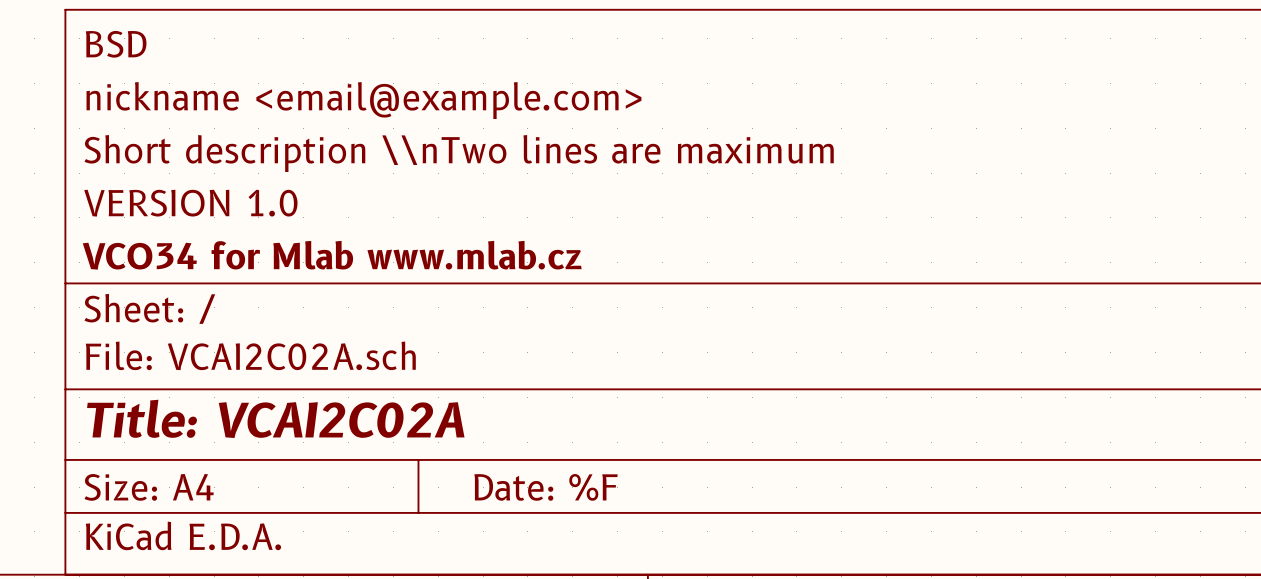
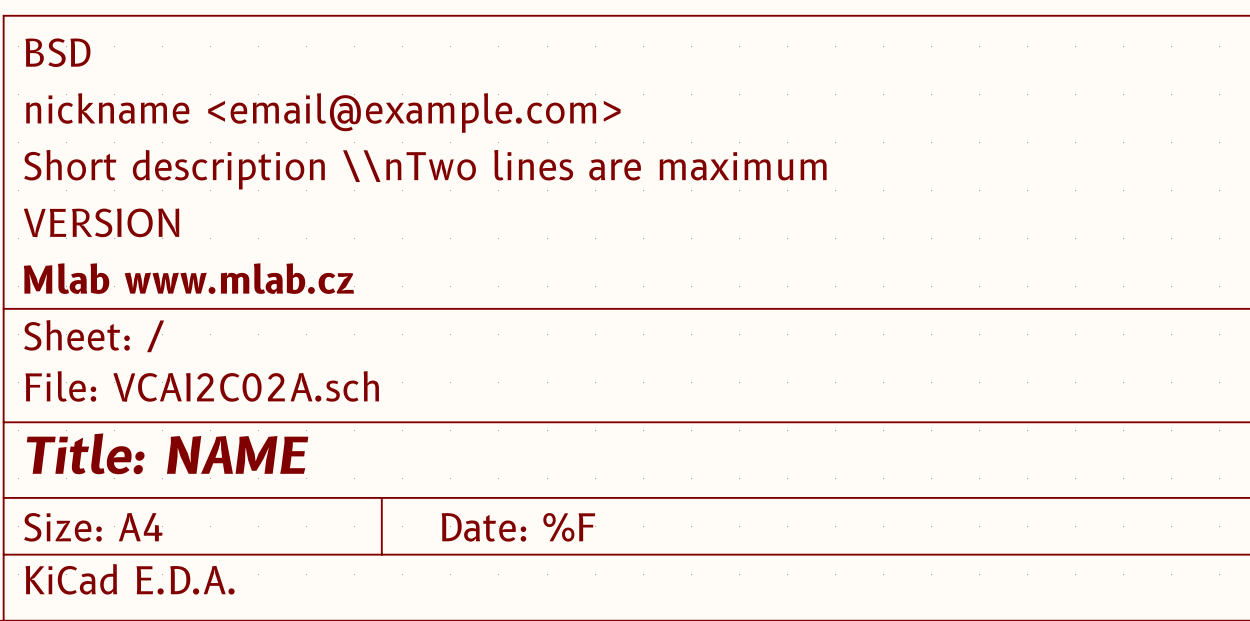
title block: VERSION 1.0 (190, 203) -> VERSION (101, 222)
title block: VCO34 for Mlab www.mlab.cz (332, 255) -> Mlab www.mlab.cz (188, 278)
title block: Title: VCAI2C02A (275, 418) -> Title: NAME (167, 453)

